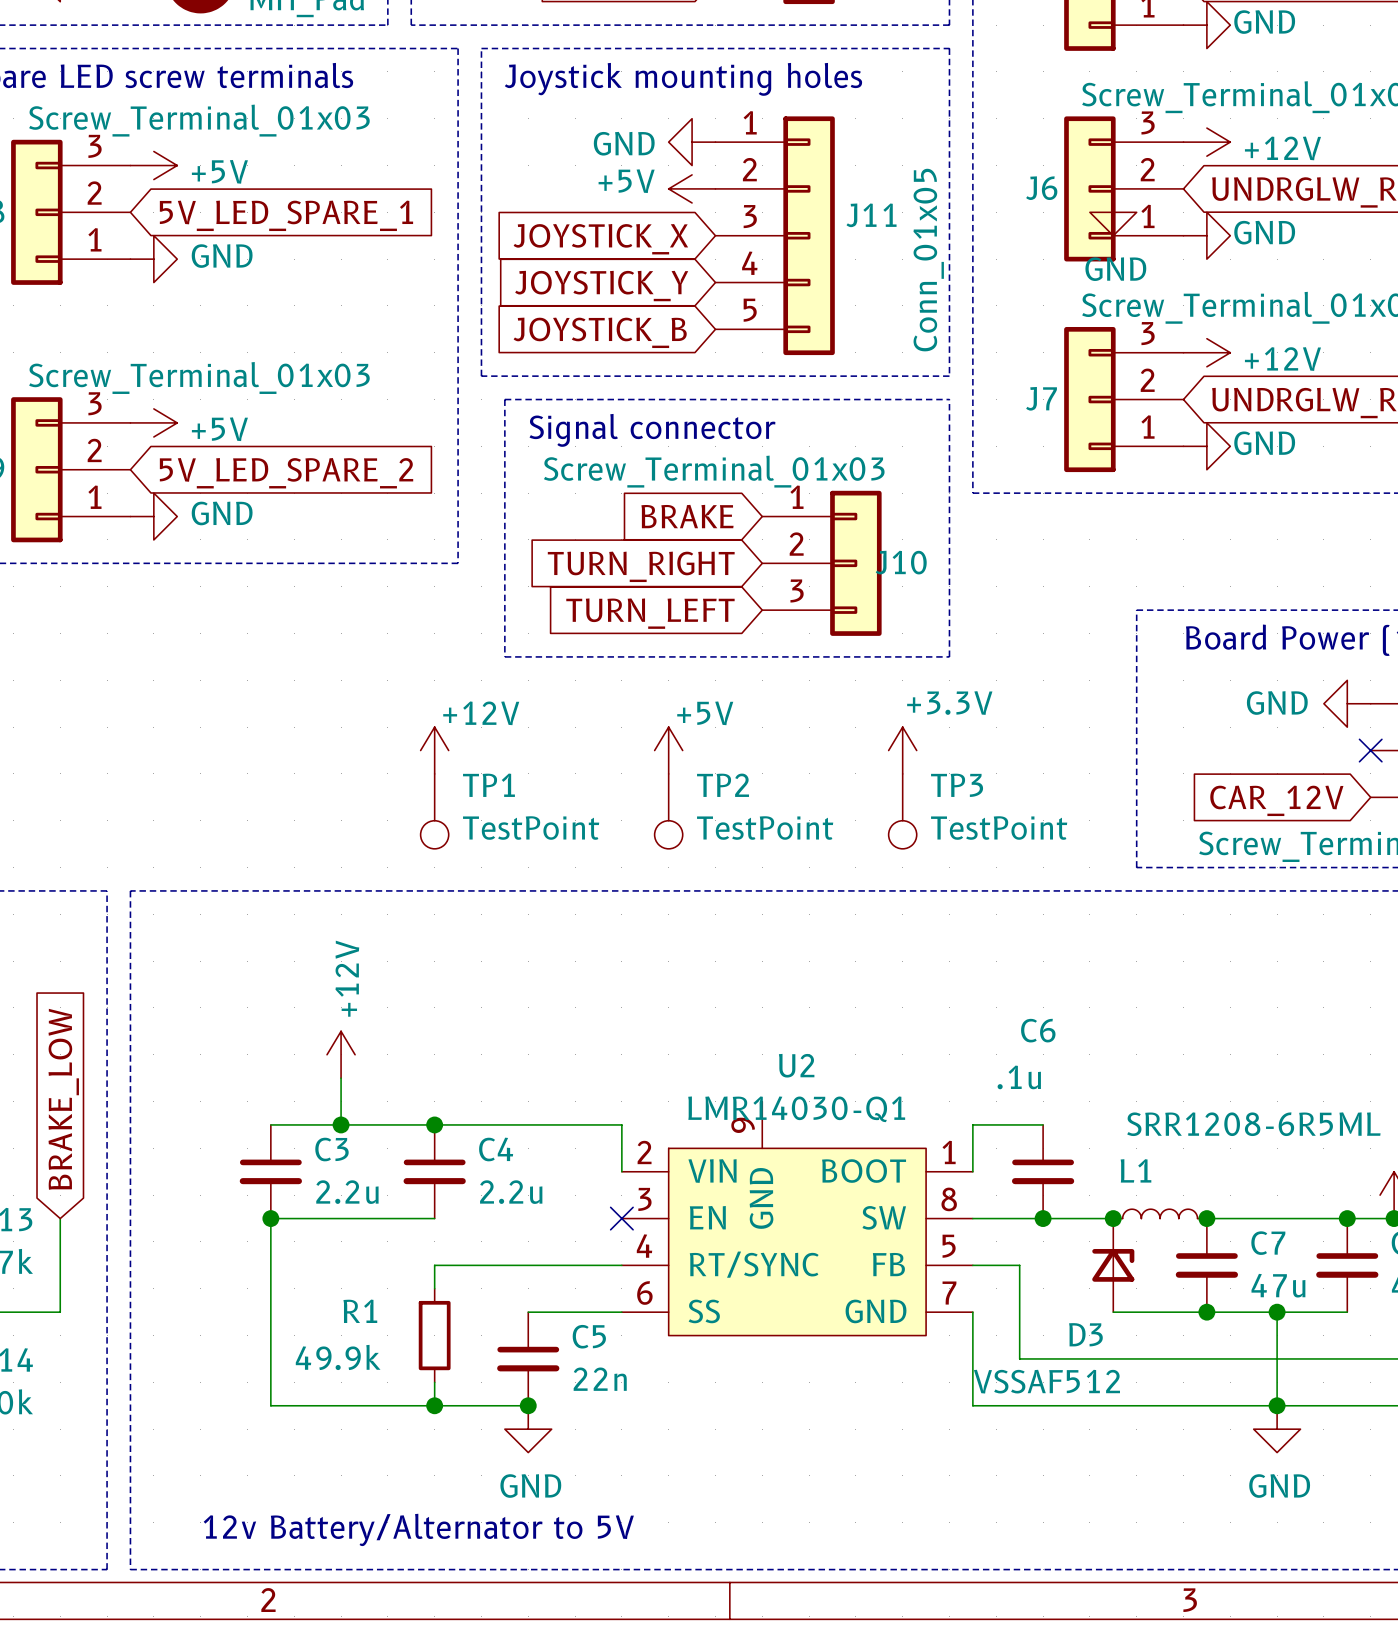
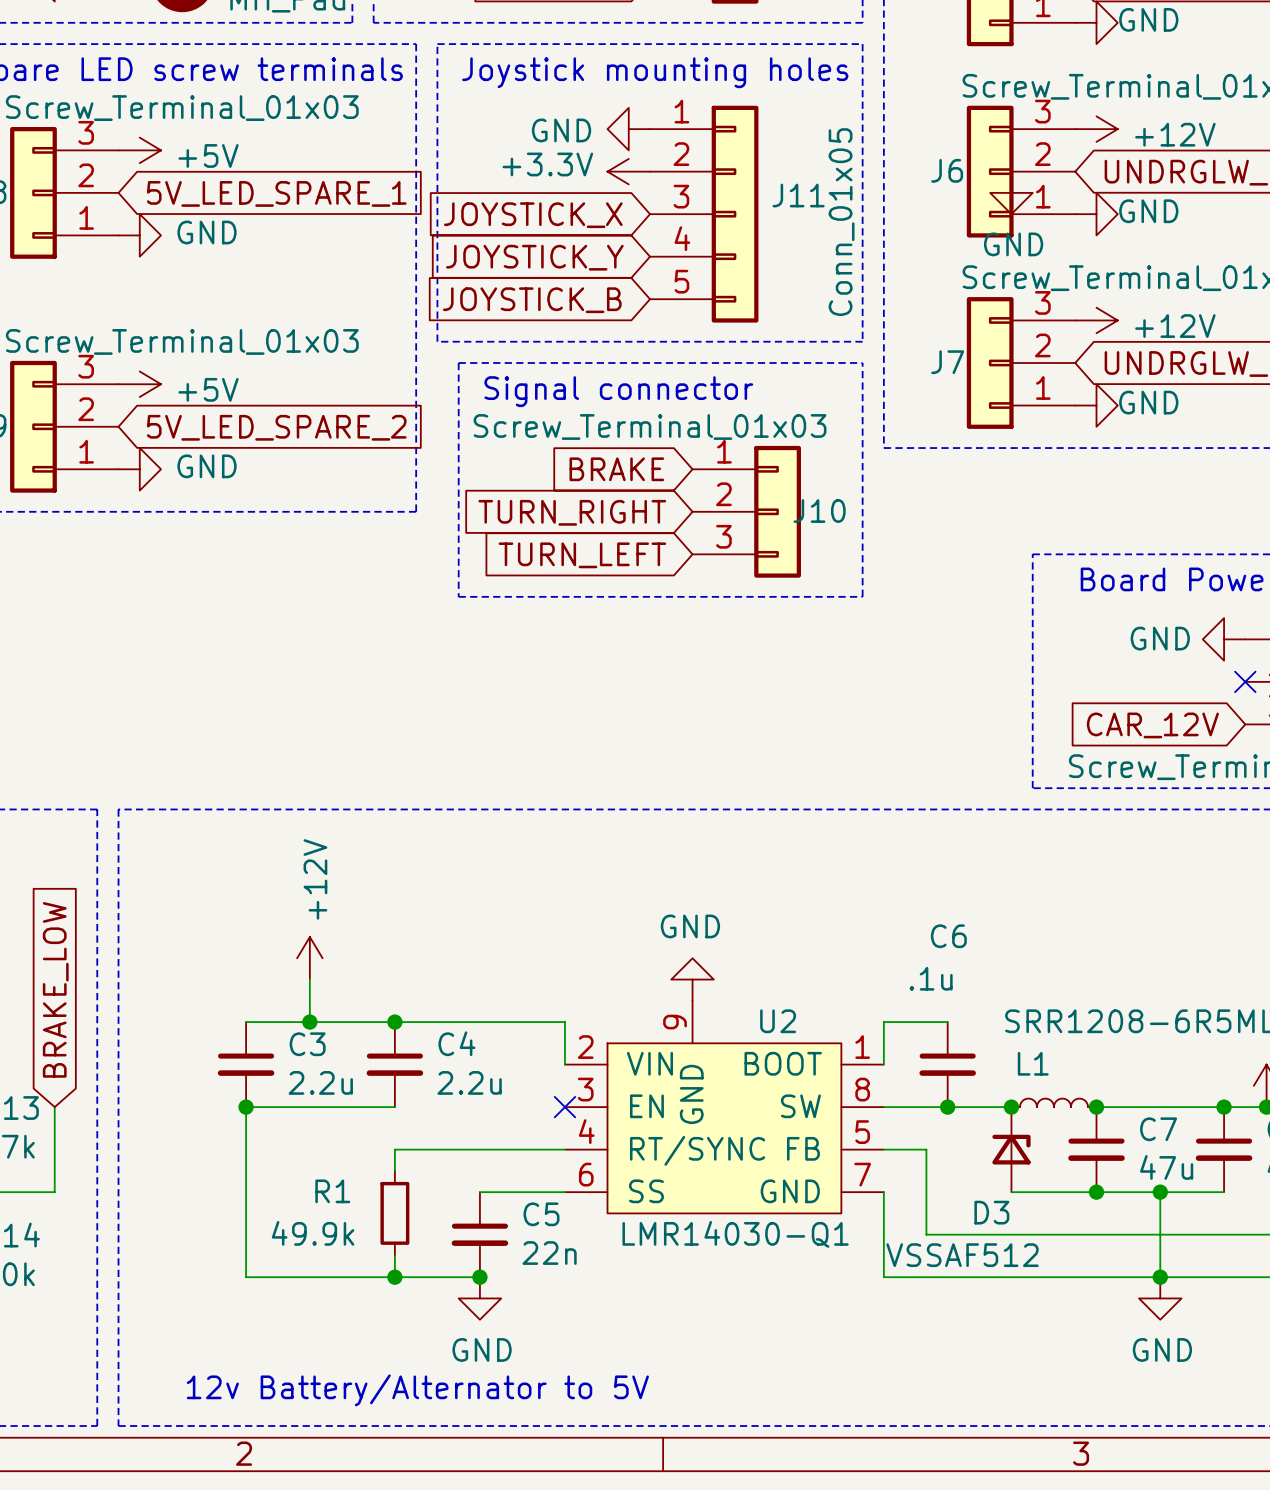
power symbol: +5V (692, 188) -> +3.3V (628, 171)
power symbol: +12V (434, 750) -> none
power symbol: +5V (668, 750) -> none
power symbol: +3.3V (902, 750) -> none
TP1: TestPoint (434, 811) -> none
TP2: TestPoint (668, 811) -> none
TP3: TestPoint (902, 811) -> none
U2 name position: U2 (796, 1065) -> U2 (778, 1021)
power symbol: none -> GND (692, 979)
U2 value position: LMR14030-Q1 (796, 1109) -> LMR14030-Q1 (735, 1234)

